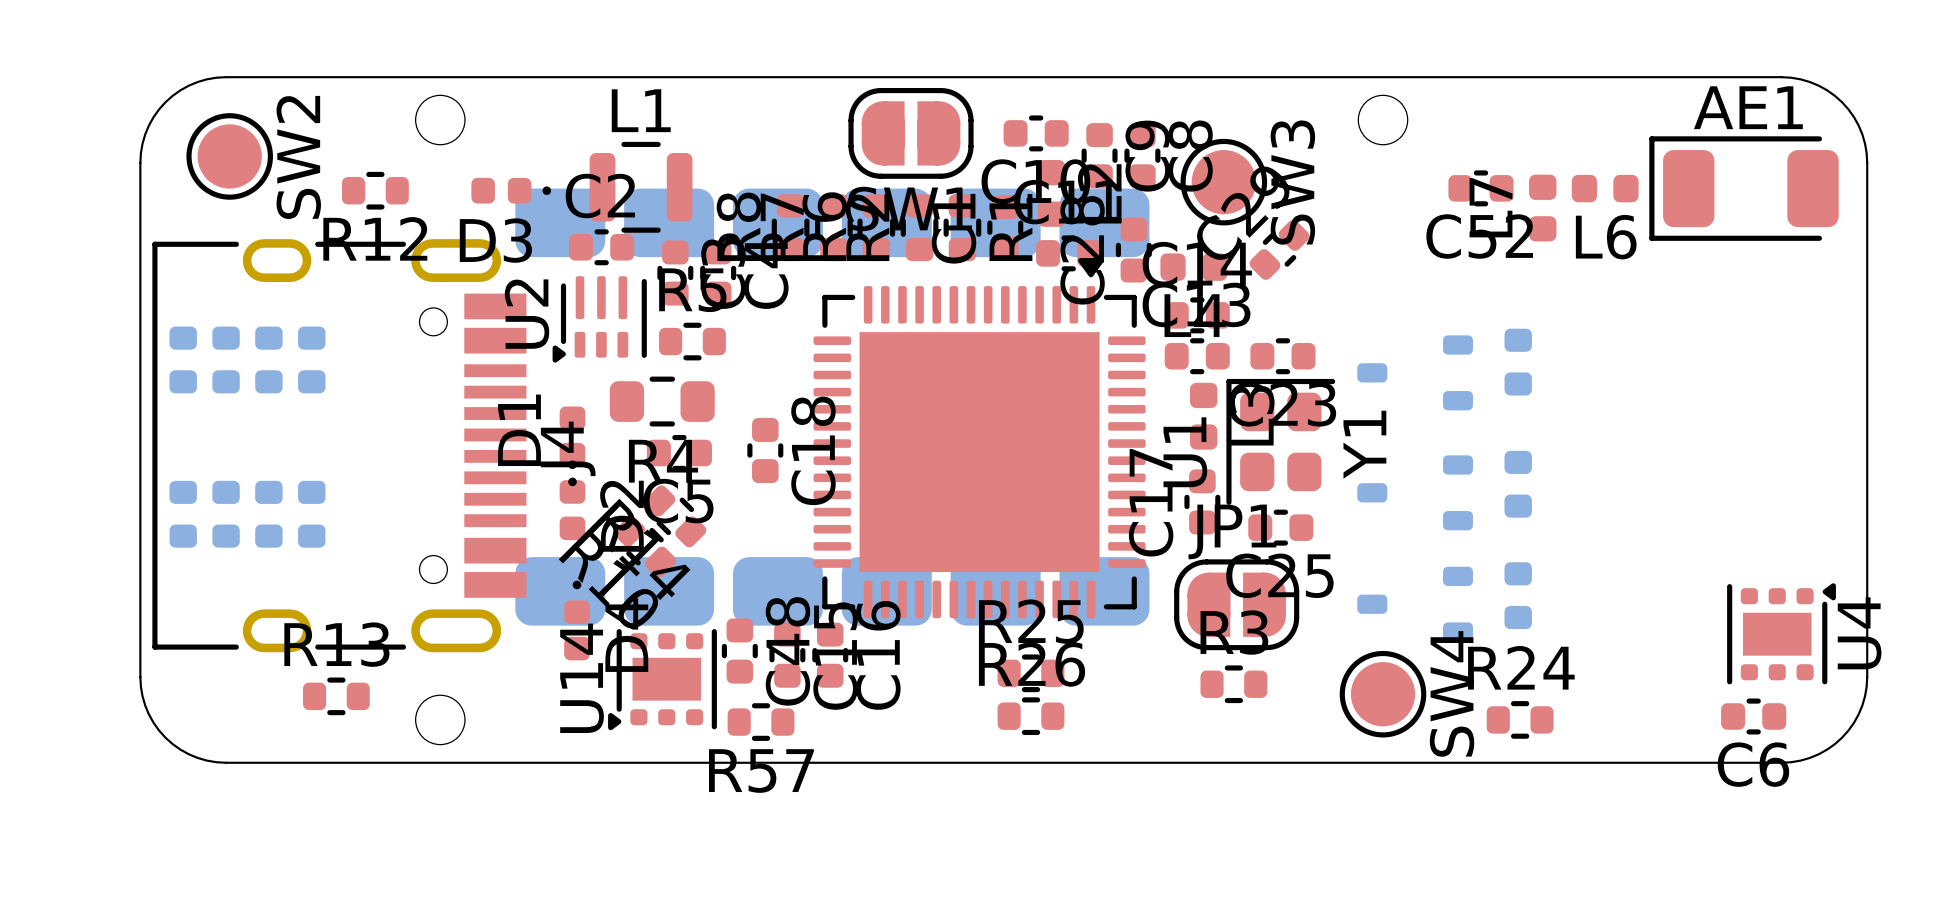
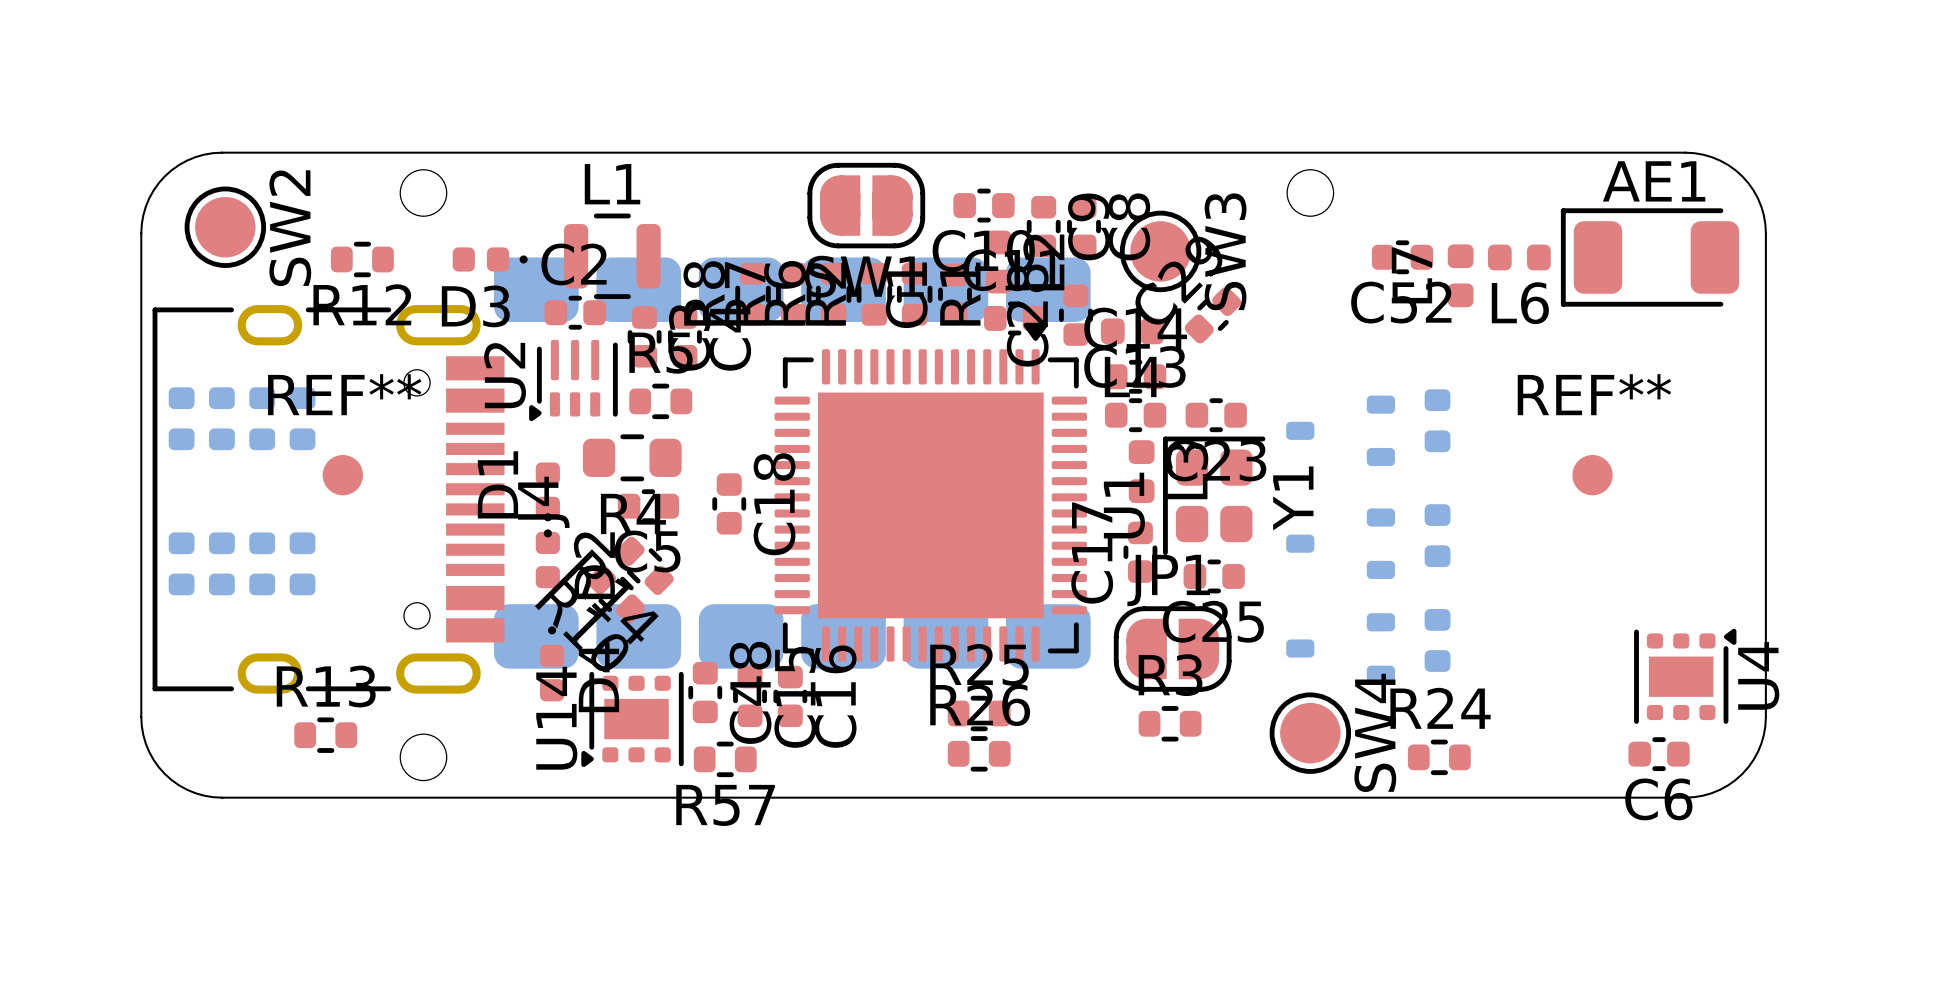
REF**: none -> (342, 475)
REF**: none -> (1592, 475)

